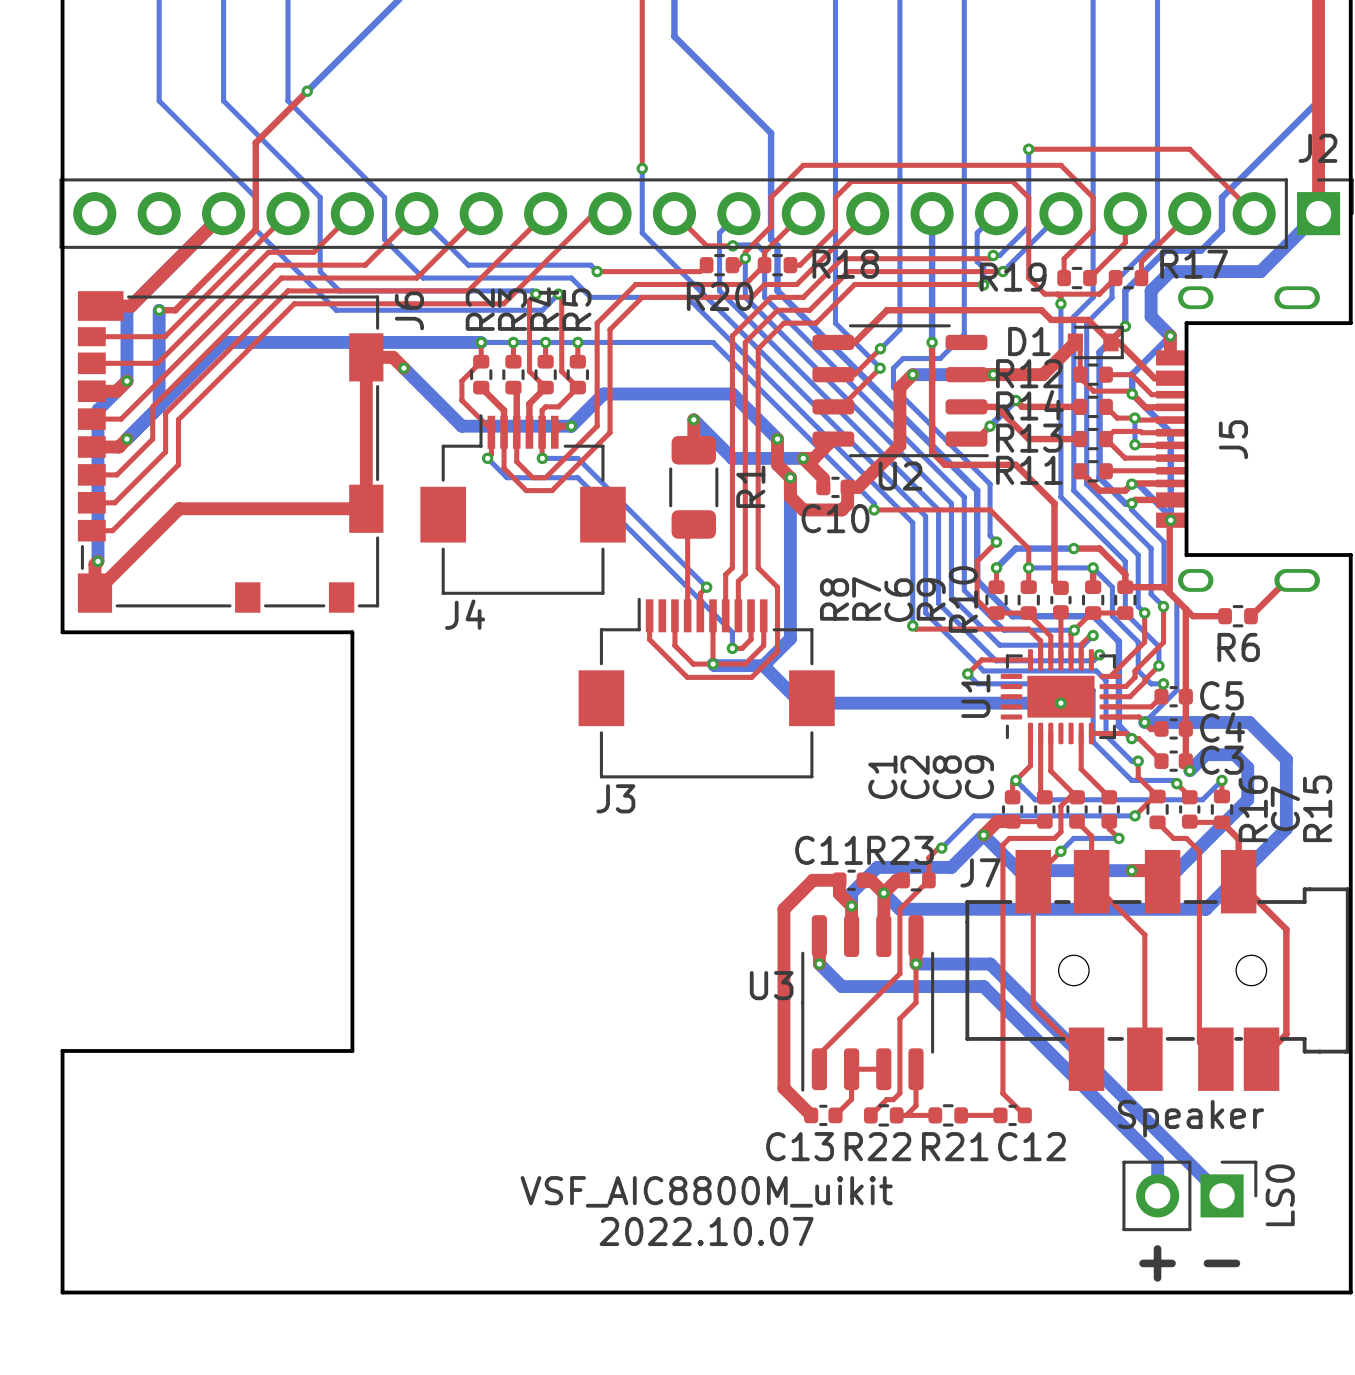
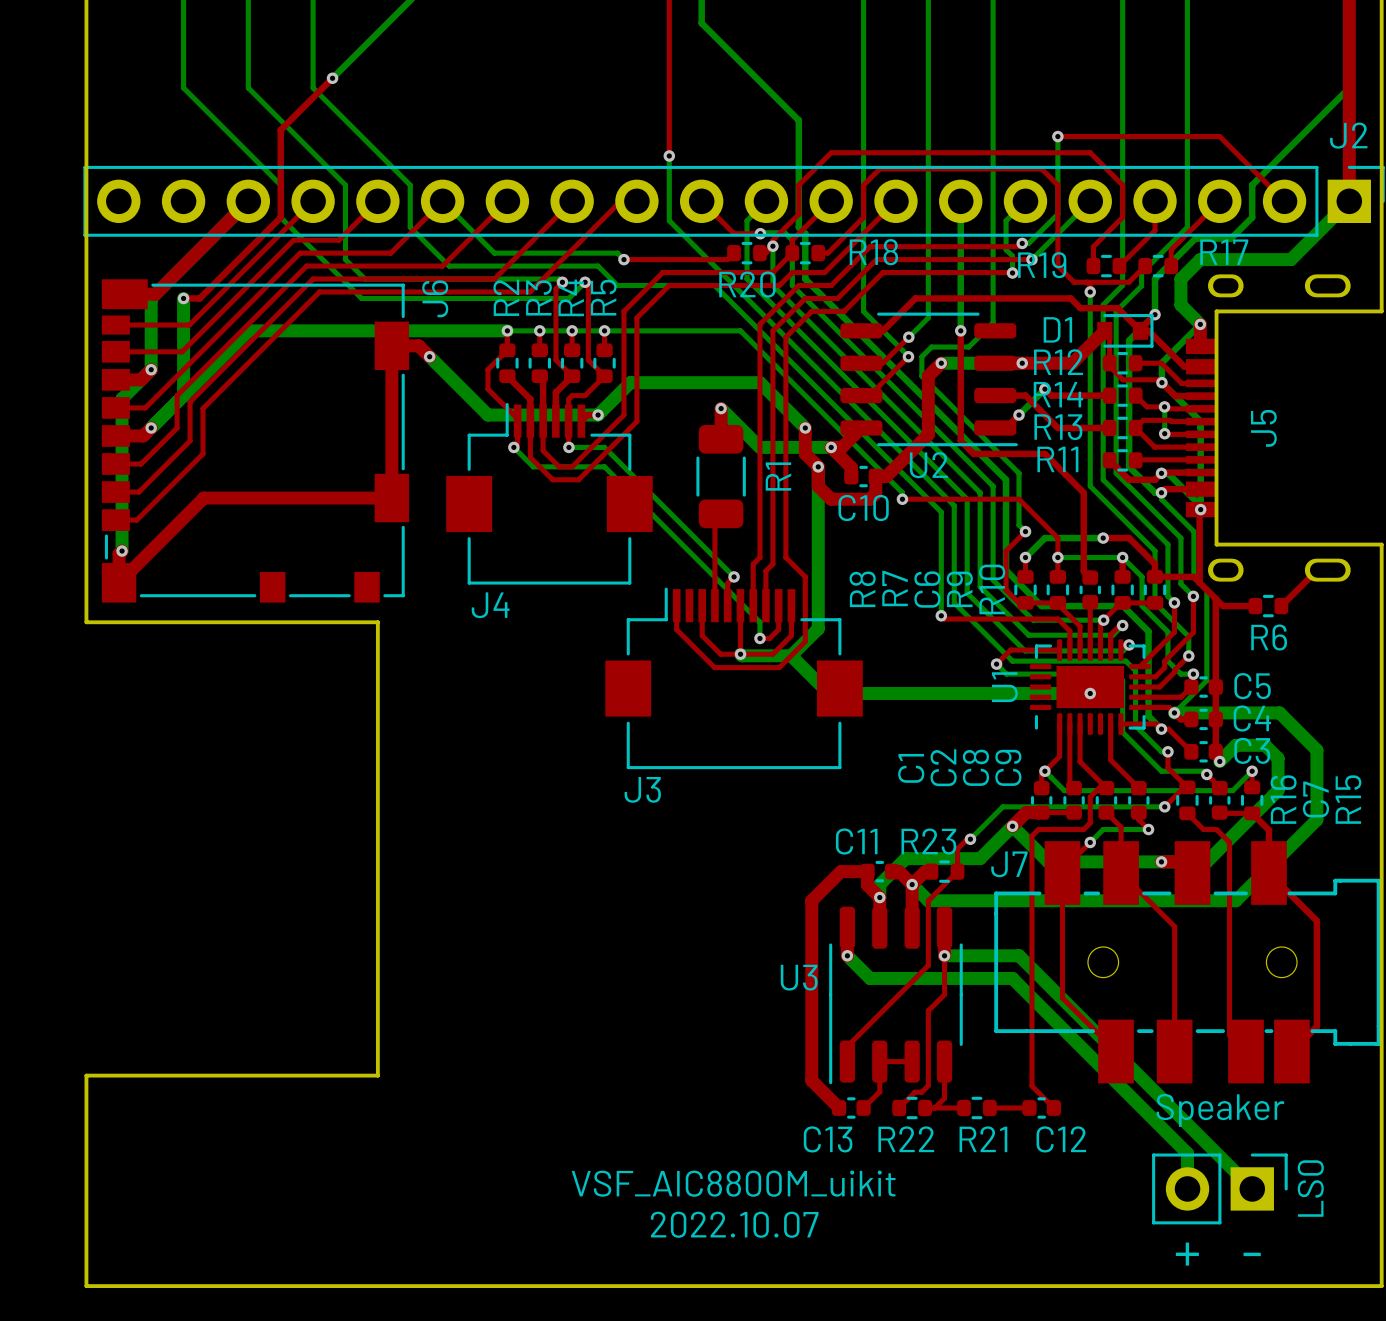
board edge: (352, 1050) (62, 1050) (62, 1083) -> (377, 1043) (377, 1075) (86, 1075)

